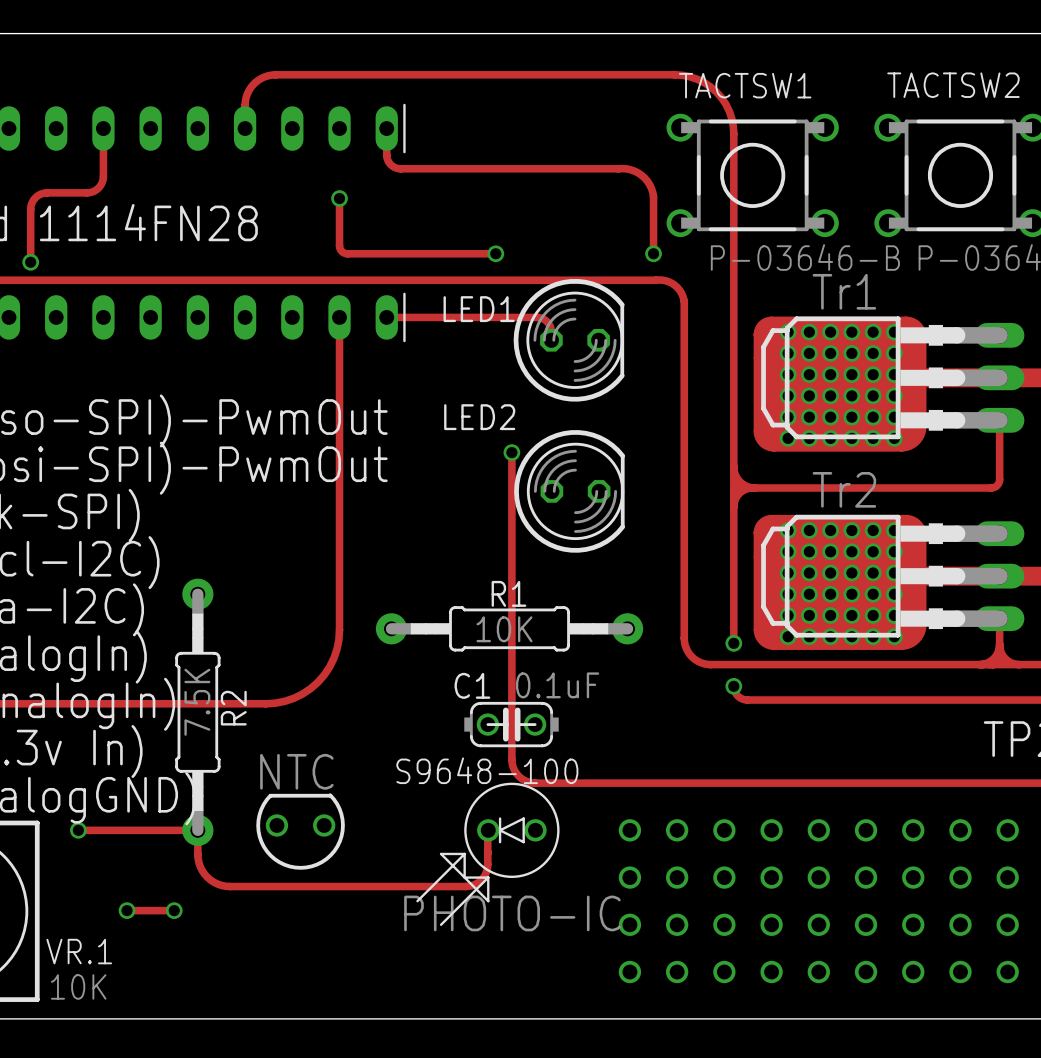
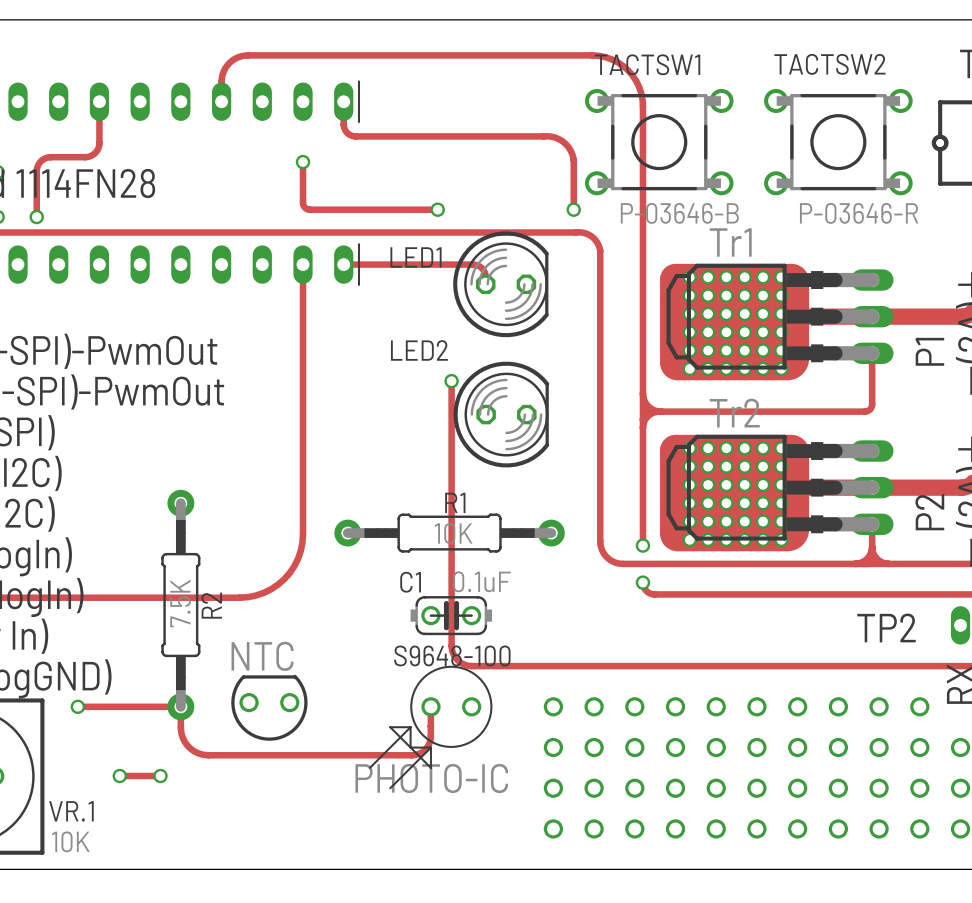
part footprint: [416, 782, 560, 926] -> [368, 665, 493, 790]

